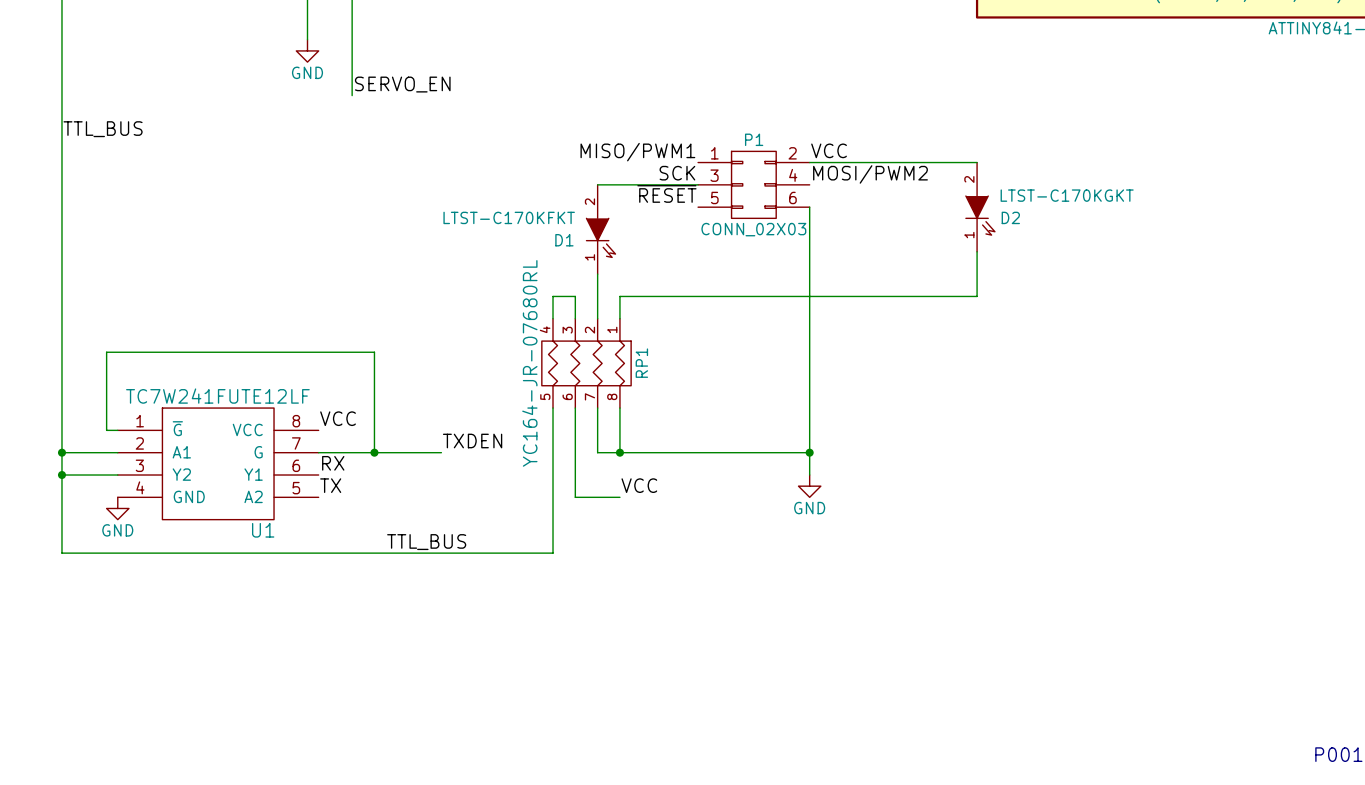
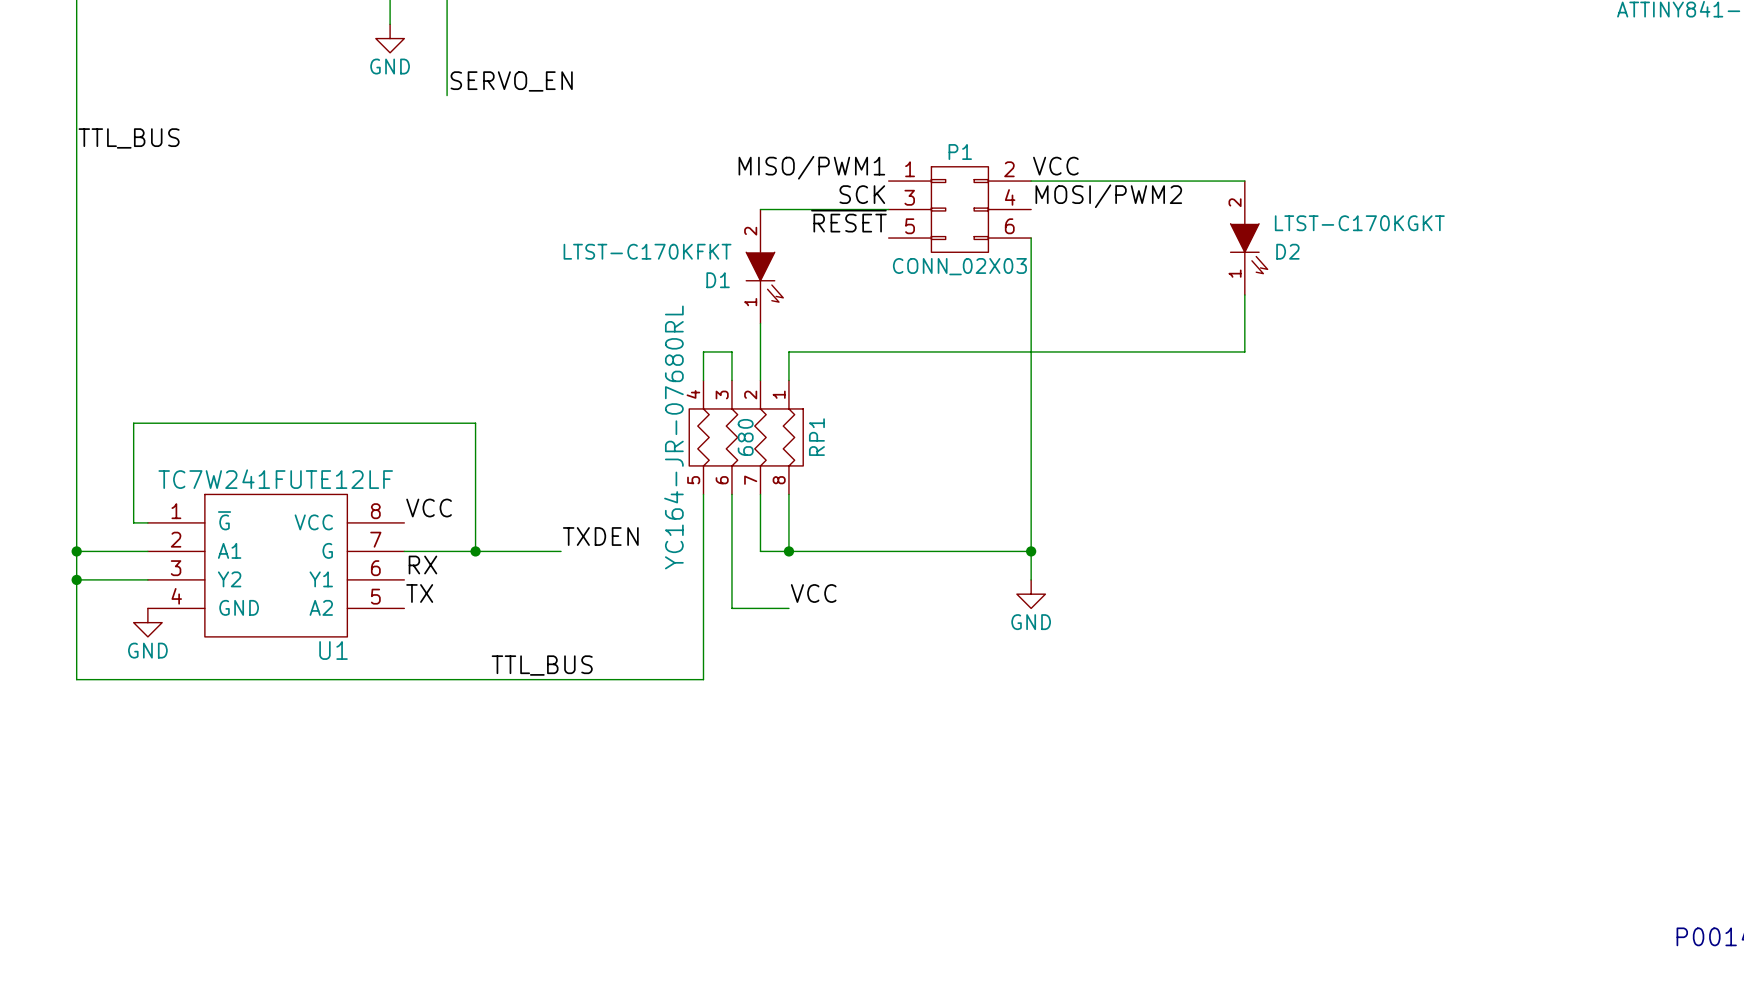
RP1 value: YC164-JR-07680RL (529, 363) -> 680 (745, 437)

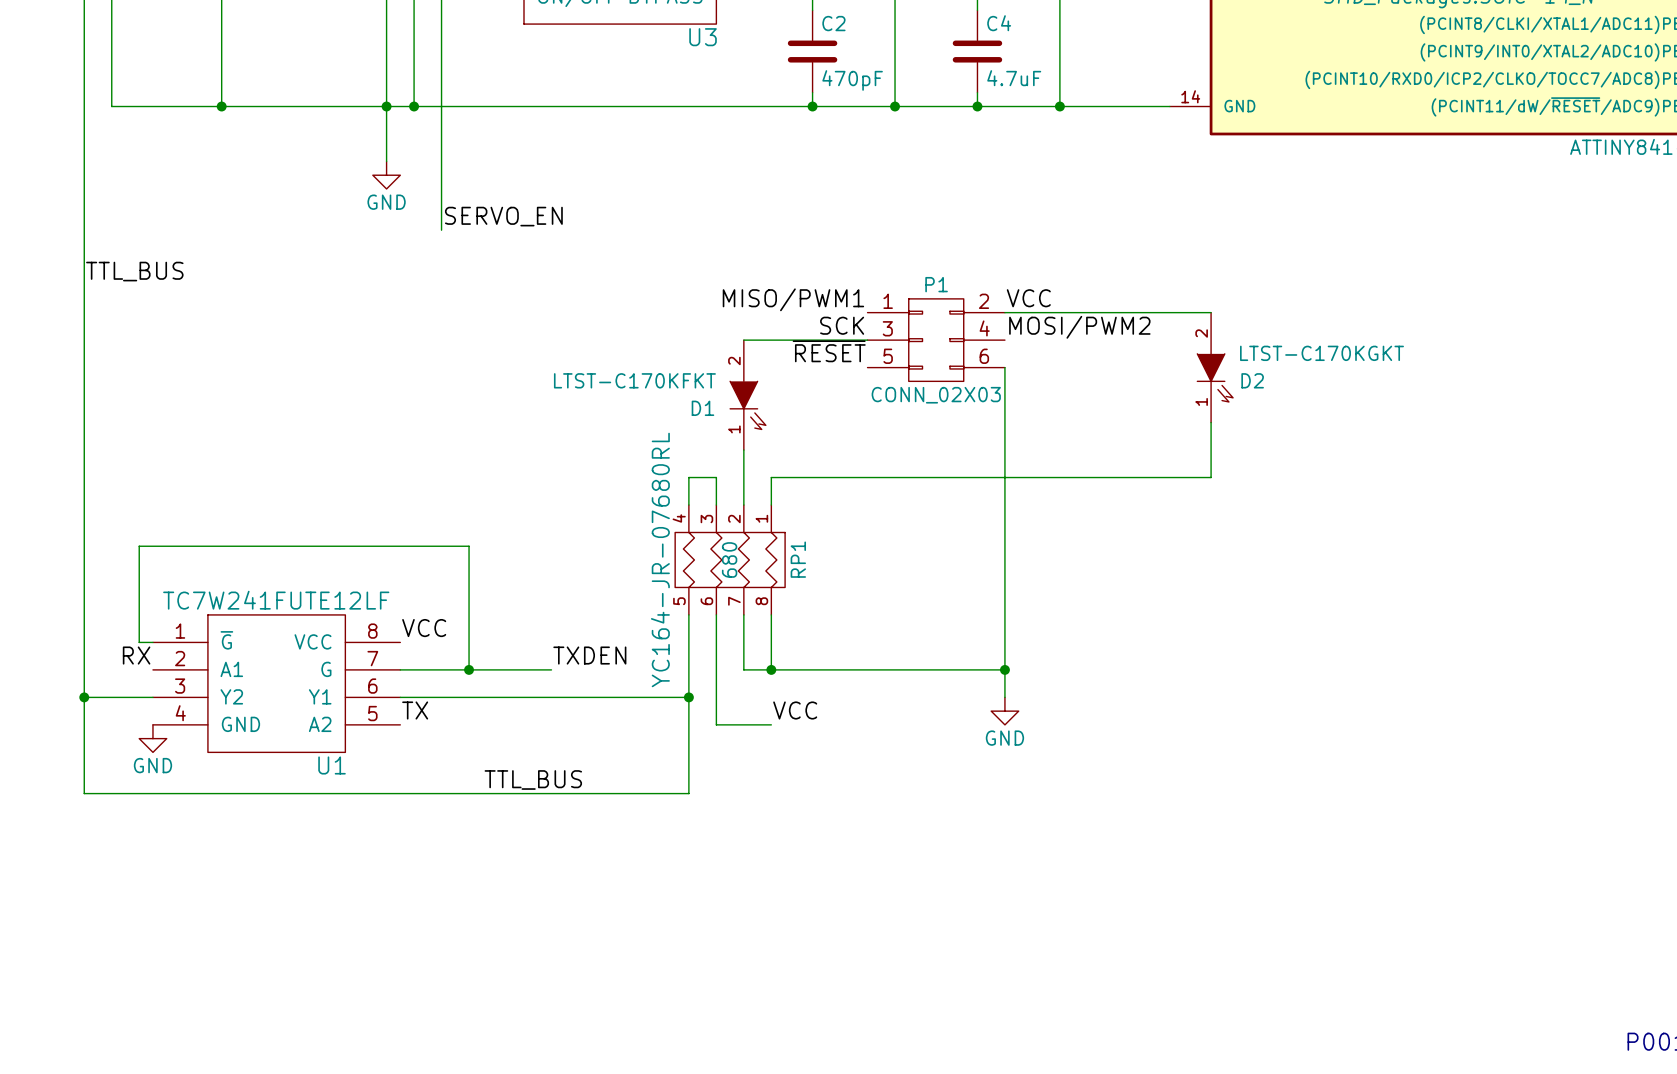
wire: (76, 551) (147, 551) -> none
junction: (76, 551) -> none
label position: RX (422, 565) -> RX (136, 655)
wire: none -> (400, 697) (688, 697)
junction: none -> (688, 697)

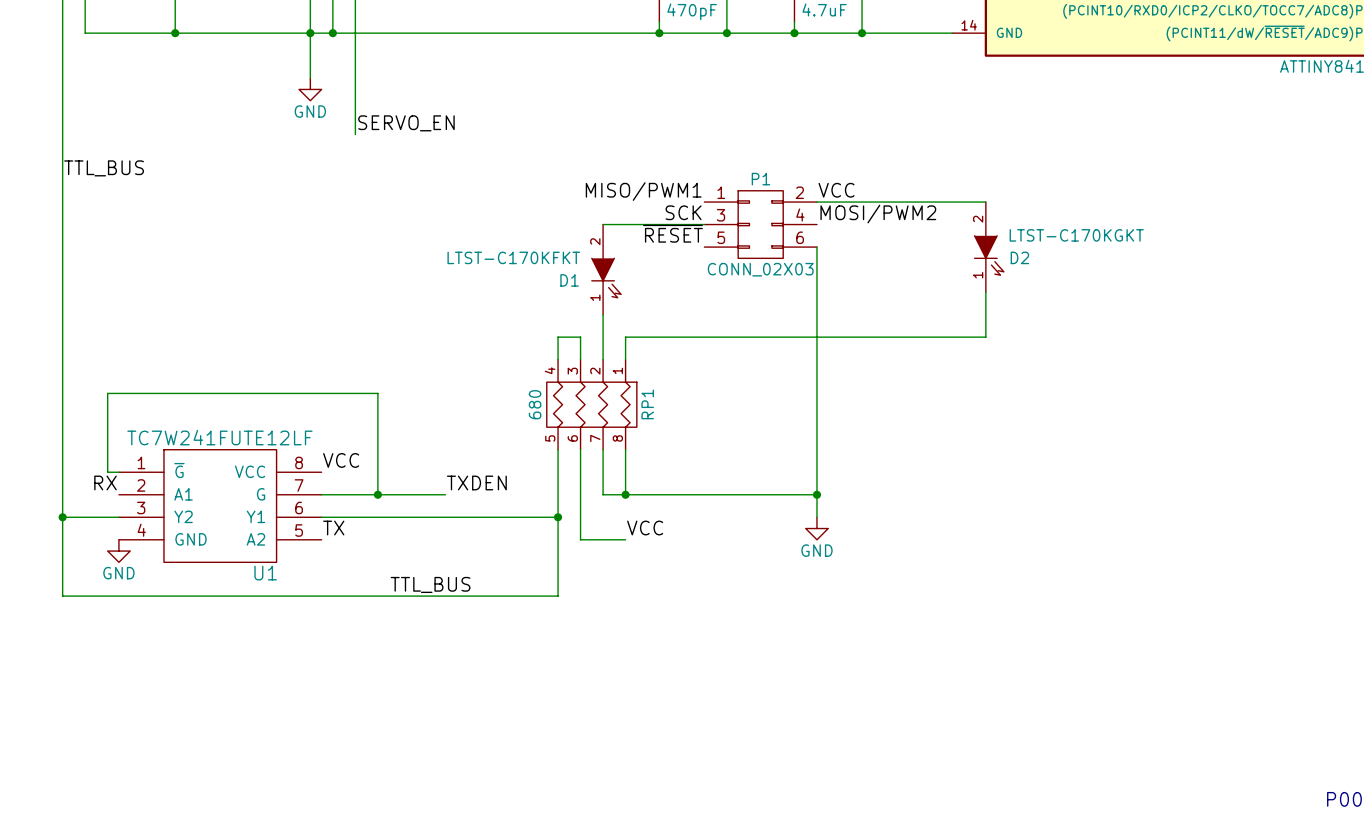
RP1 text: YC164-JR-07680RL (660, 559) -> none
RP1 value position: 680 (729, 559) -> 680 (535, 404)

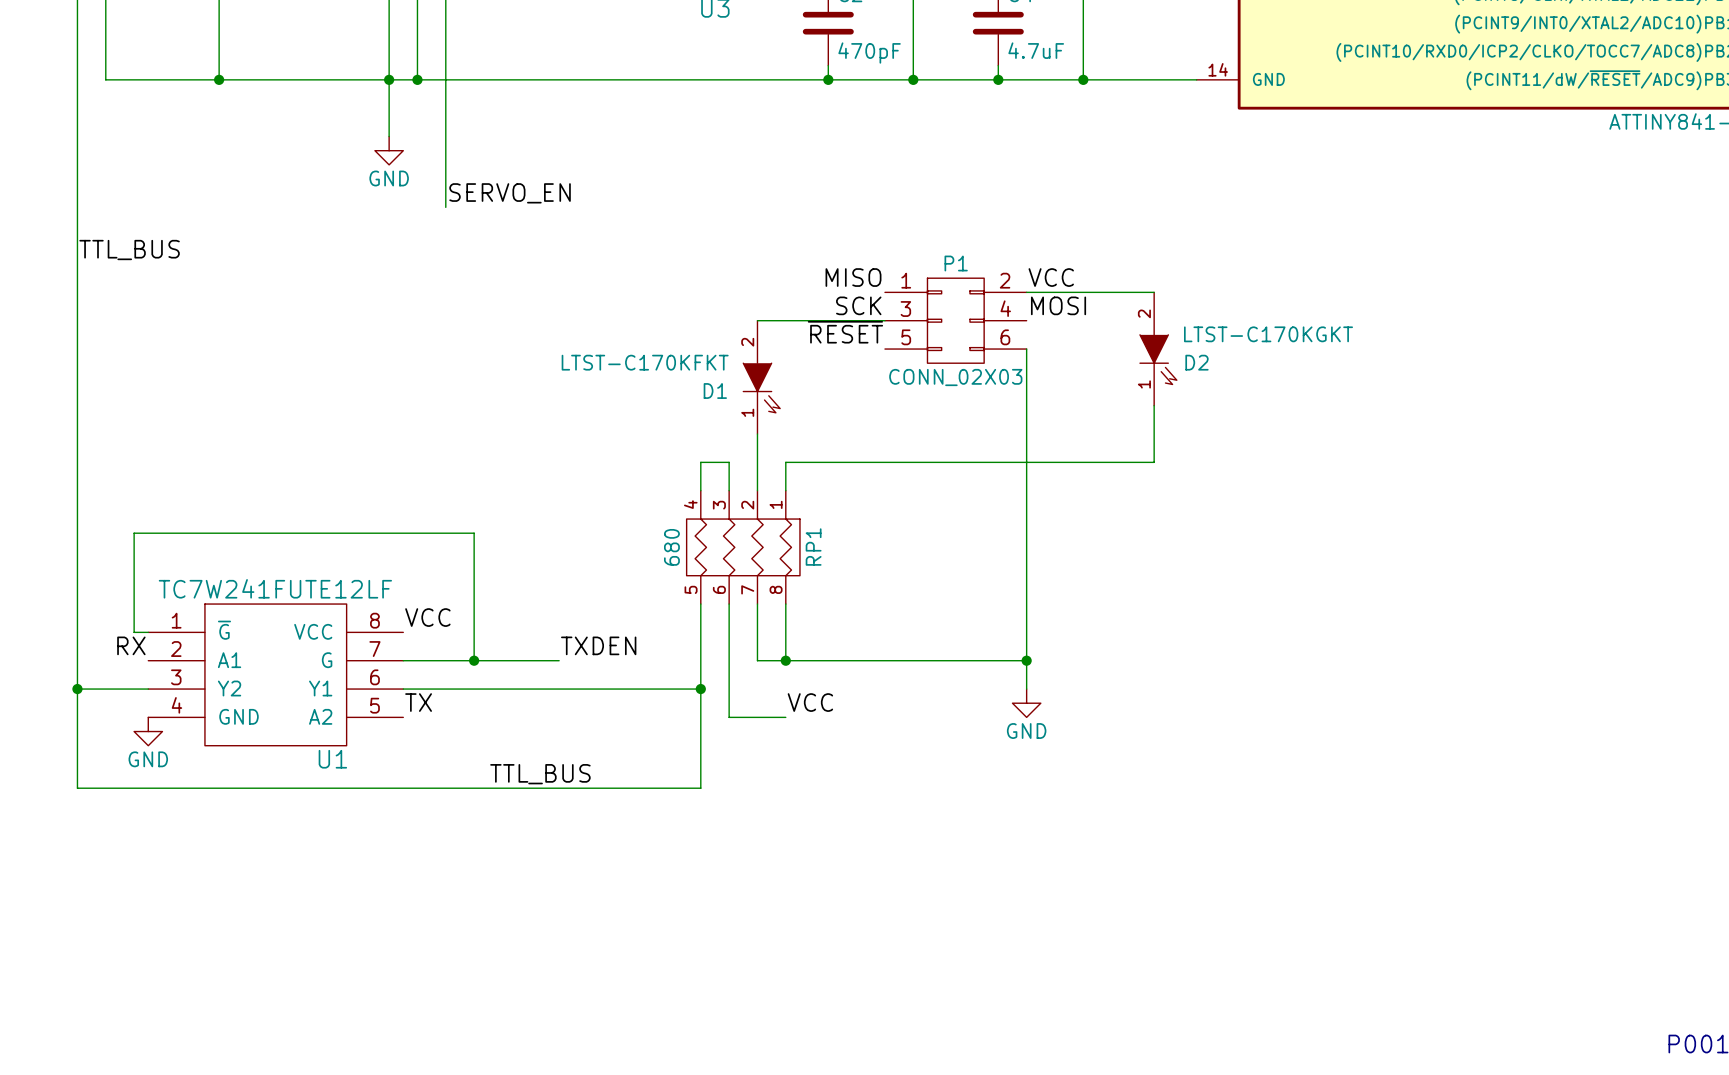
label: MISO/PWM1 (643, 191) -> MISO (853, 277)
wire: (918, 202) (985, 202) -> none
label: MOSI/PWM2 (878, 214) -> MOSI (1058, 305)
D2 position: (989, 247) -> (1158, 349)
wire: (985, 292) (985, 337) (918, 337) -> (1154, 405) (1154, 462)

